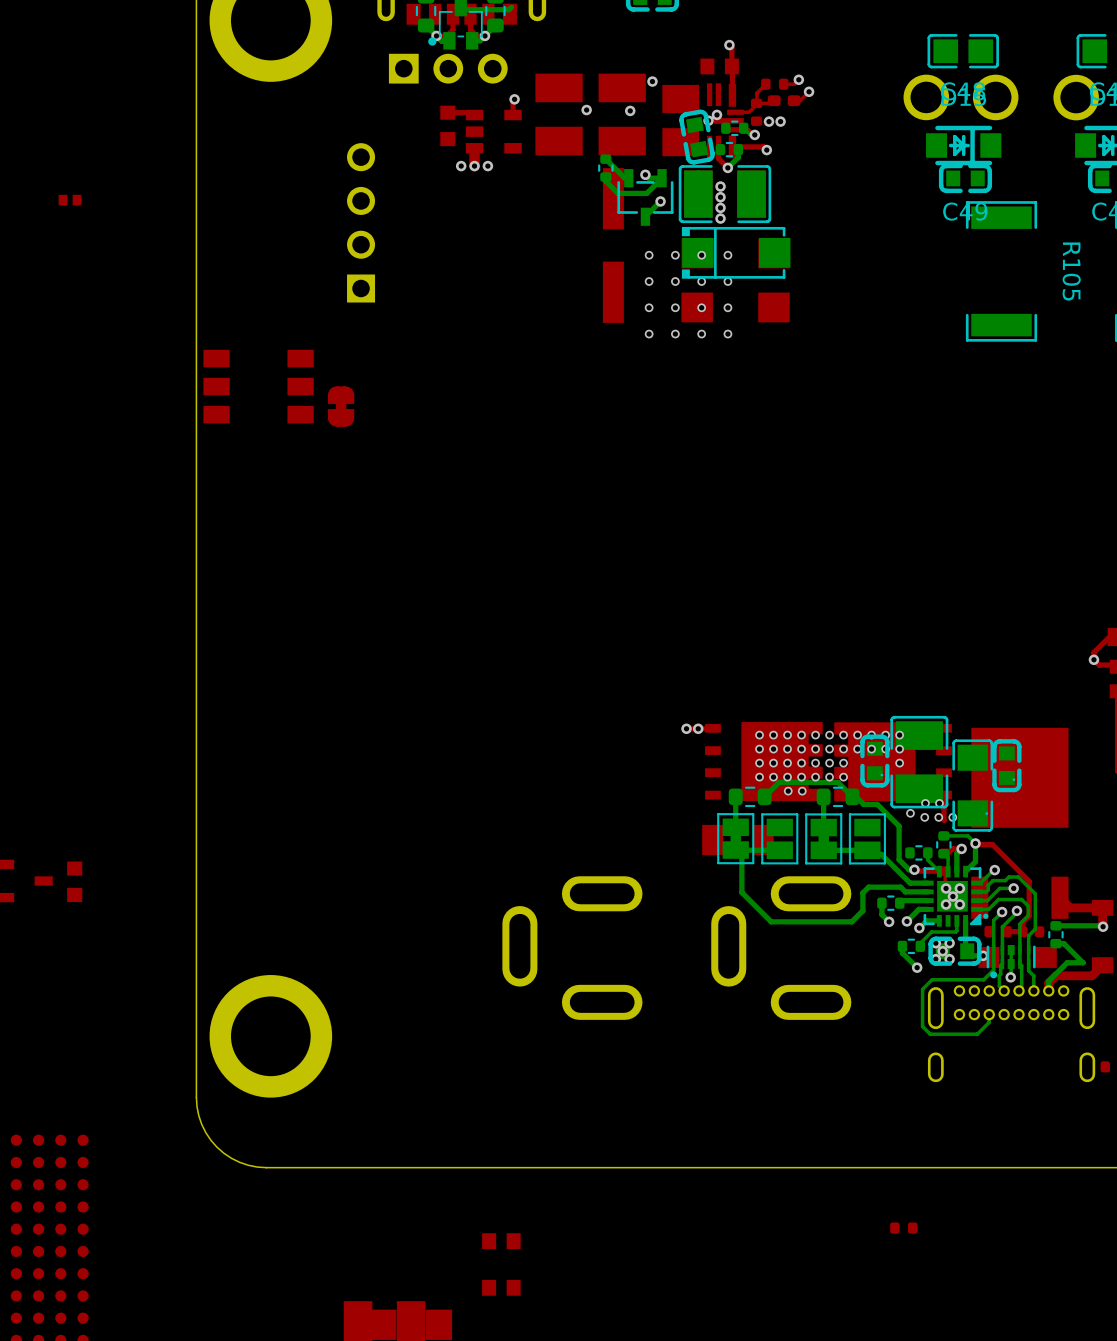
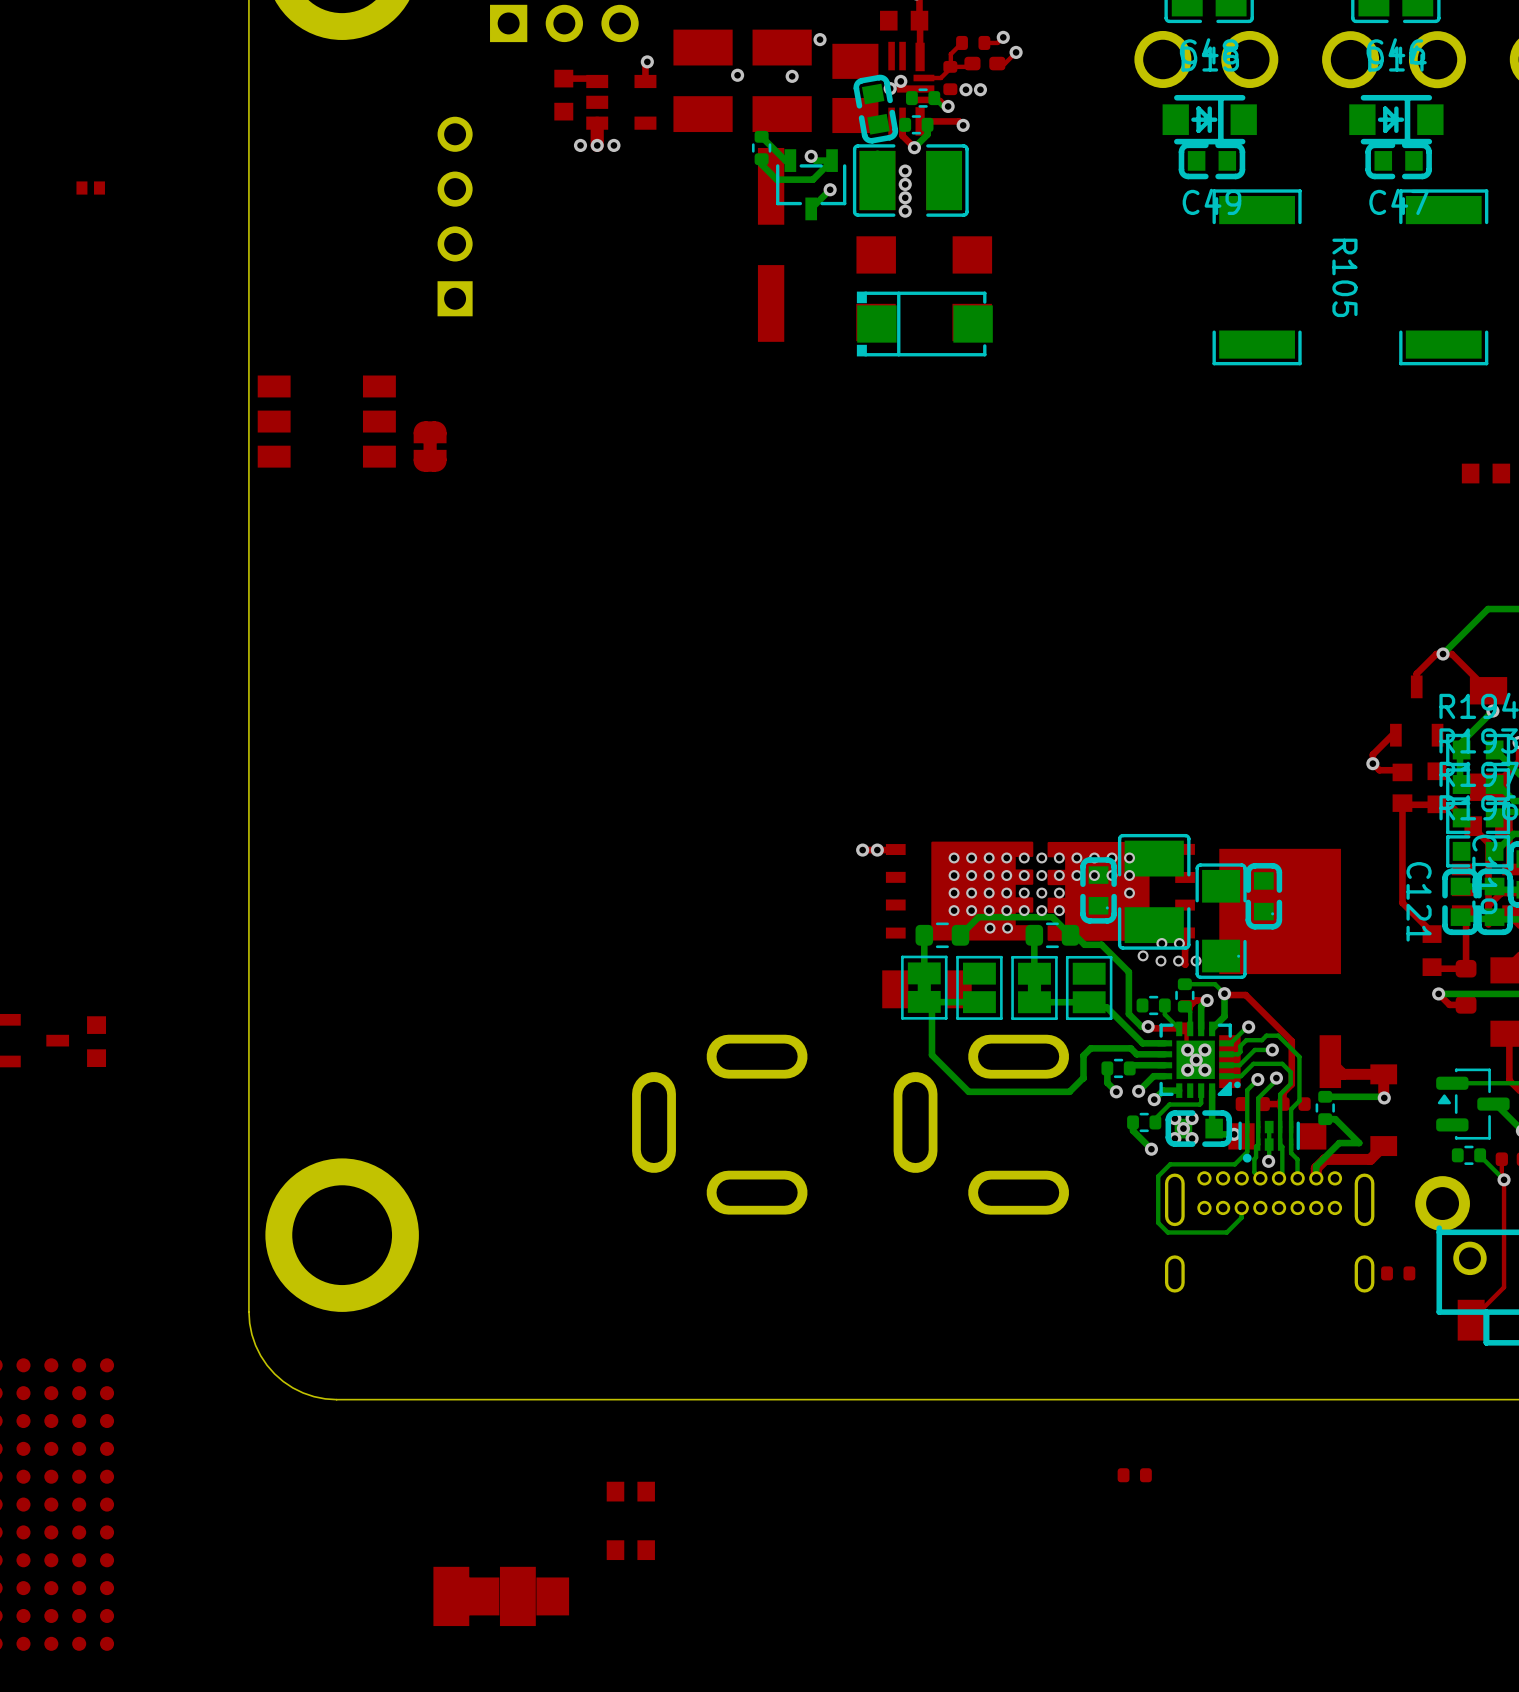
part position: (736, 252) -> (924, 324)
via: (649, 255) -> none
via: (675, 255) -> none
via: (701, 255) -> none
via: (727, 255) -> none
via: (649, 281) -> none
via: (675, 281) -> none
via: (701, 281) -> none
via: (727, 281) -> none
via: (649, 307) -> none
via: (675, 307) -> none
via: (701, 307) -> none
via: (727, 307) -> none
via: (649, 334) -> none
via: (675, 334) -> none
via: (701, 334) -> none
via: (727, 334) -> none

